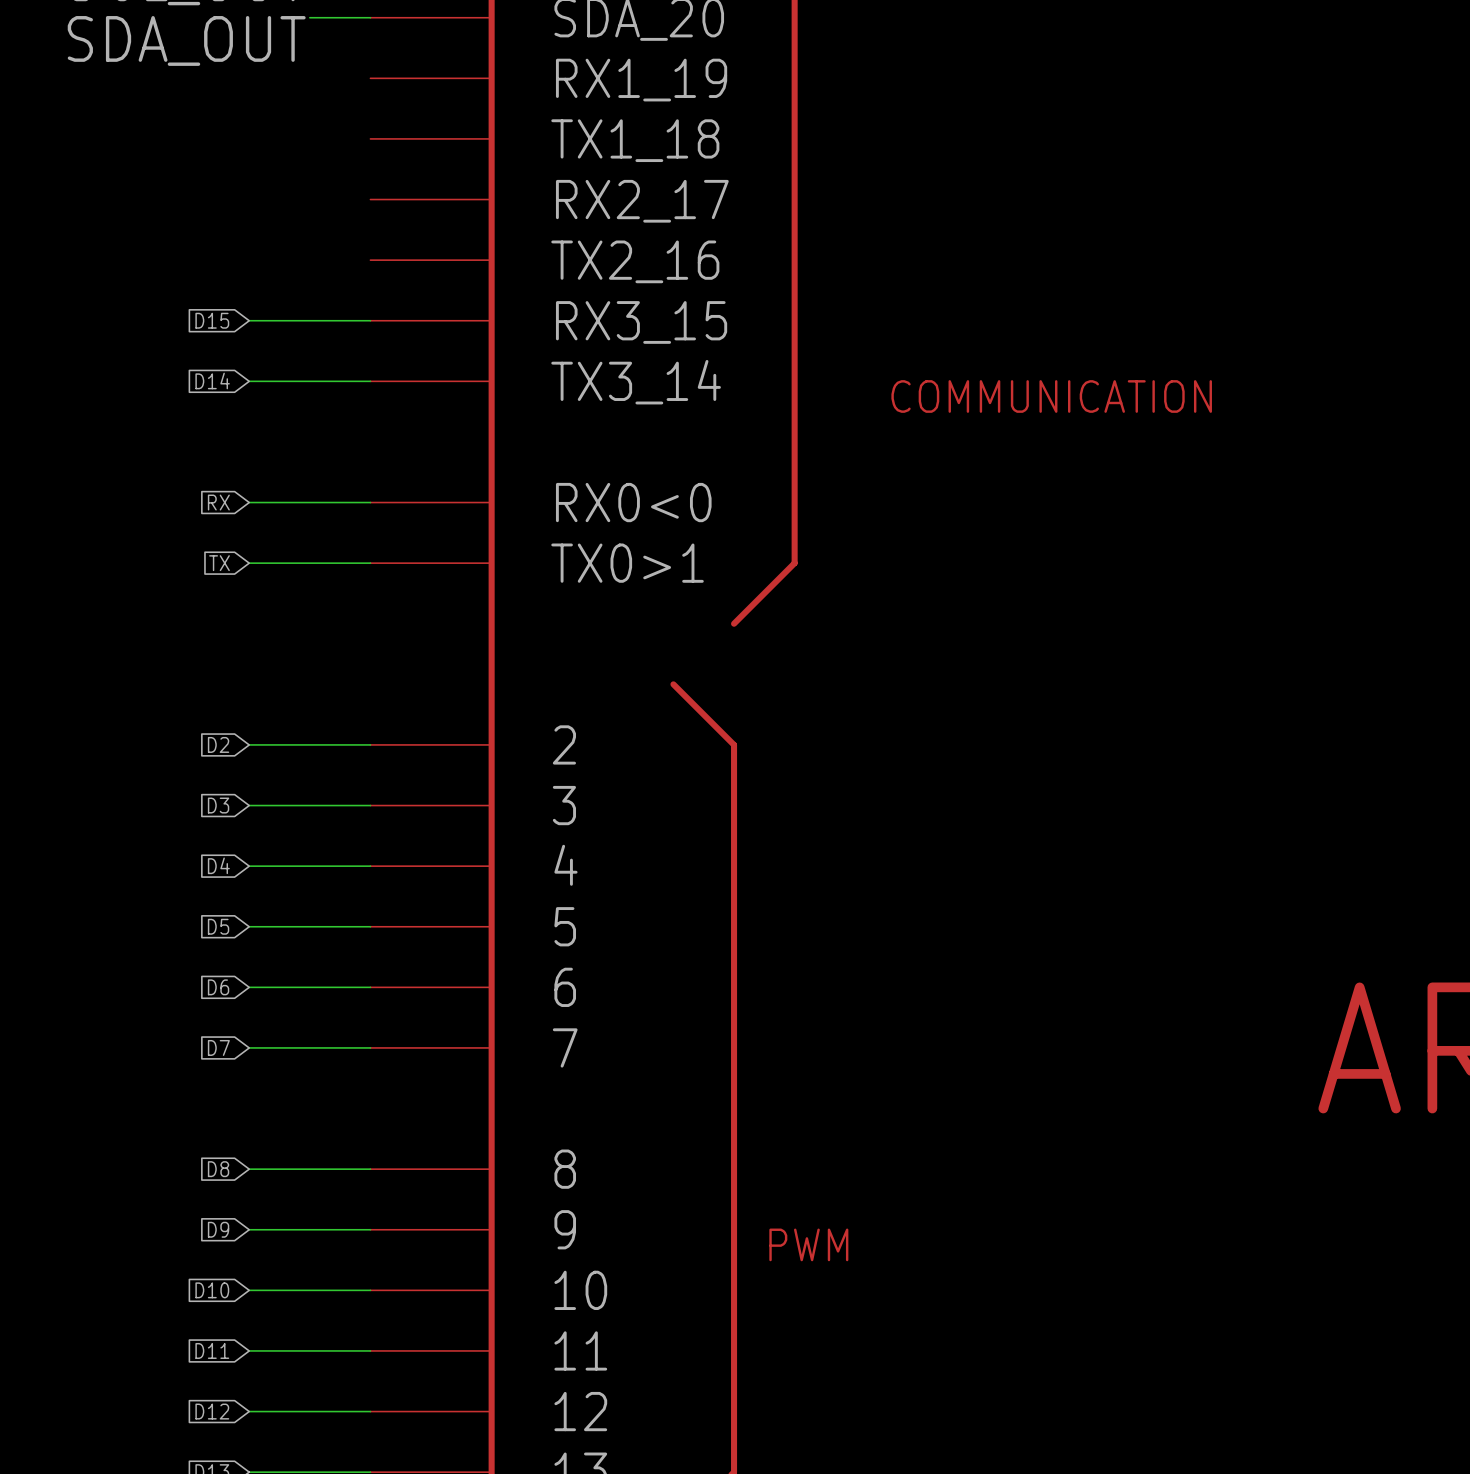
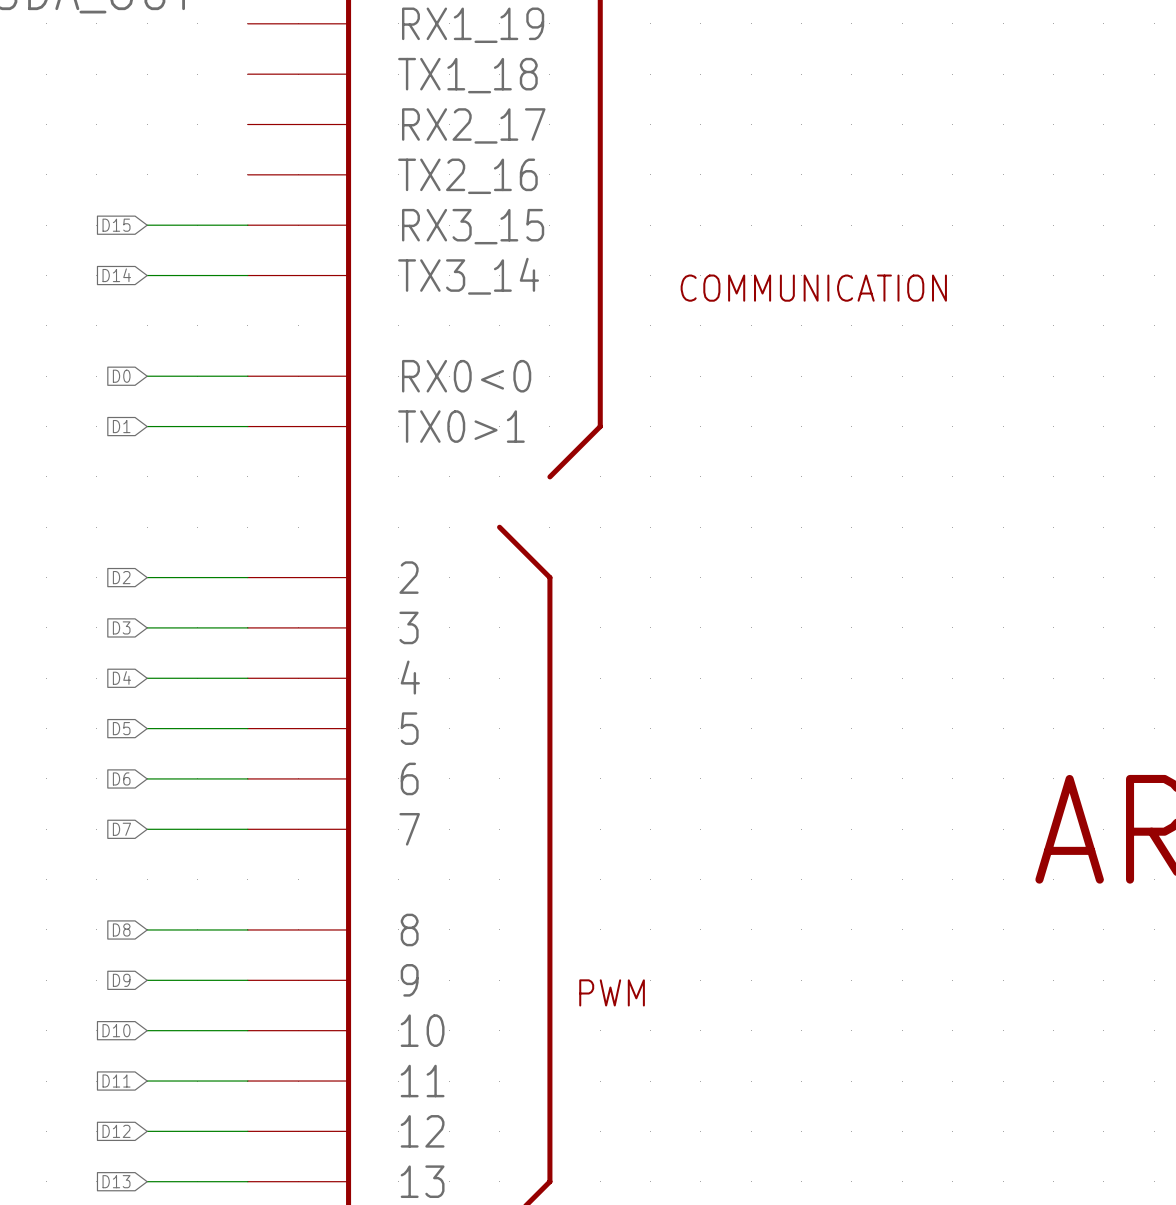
global label: RX (218, 502) -> D0 (121, 376)
global label: TX (219, 563) -> D1 (121, 426)

